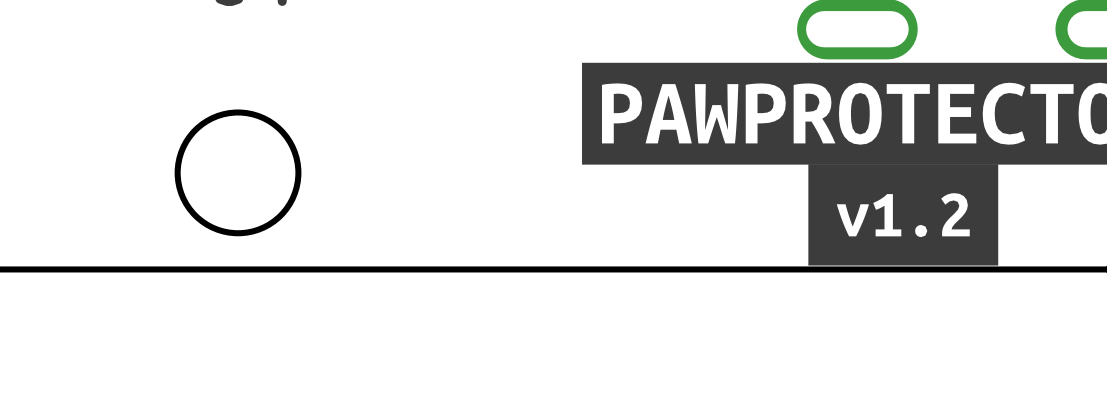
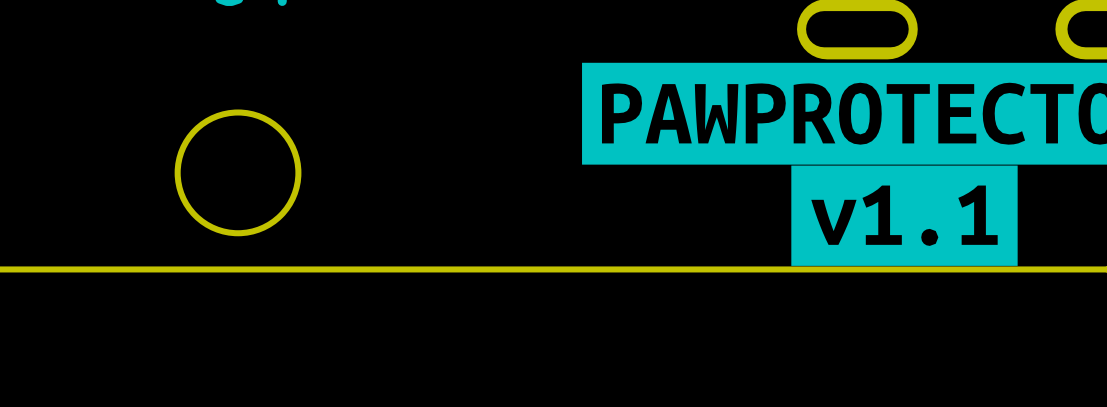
drawing shape: [808, 164, 999, 266] -> [791, 165, 1018, 266]

